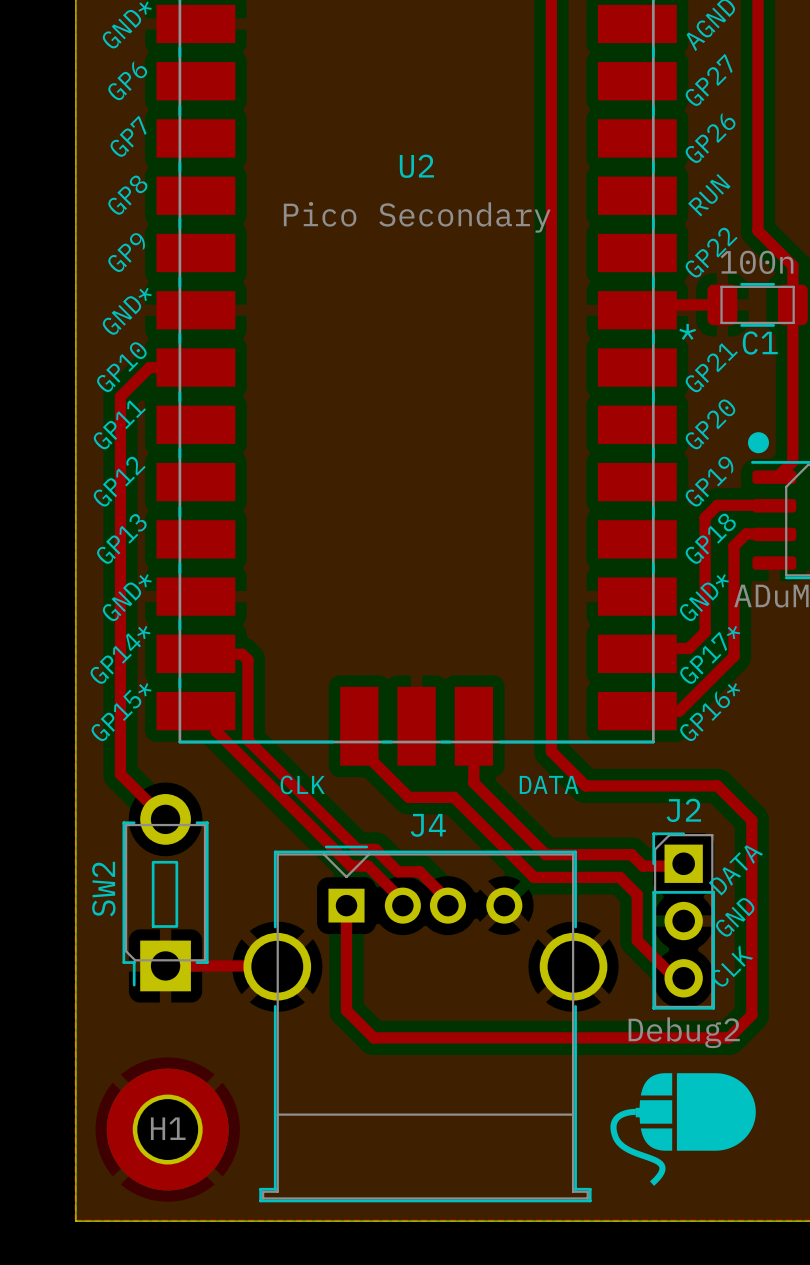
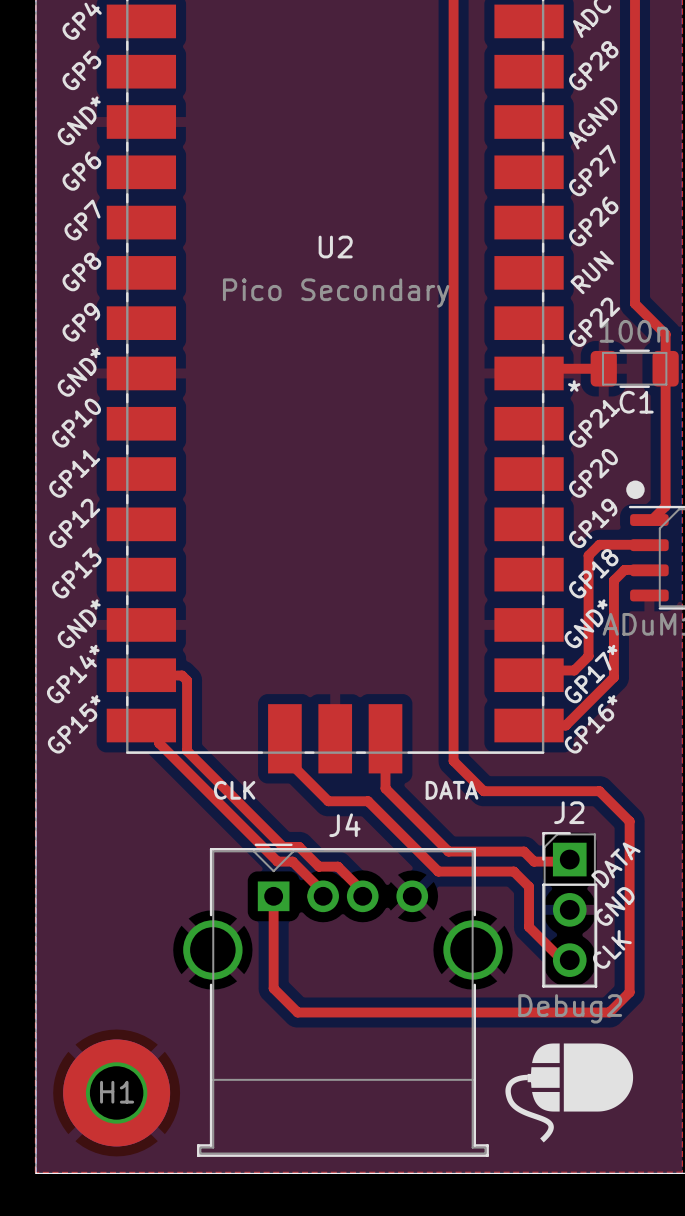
top track: (216, 367) (149, 367) (120, 396) (120, 774) (165, 819) -> none
SW2: (165, 892) -> none
top track: (165, 965) (277, 966) -> none

